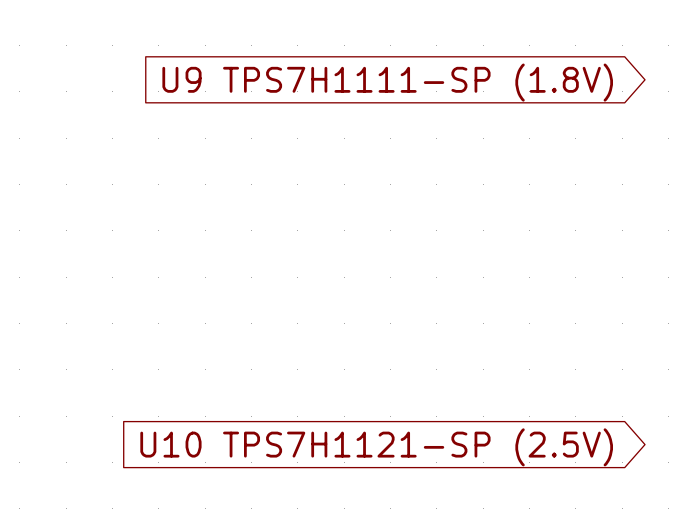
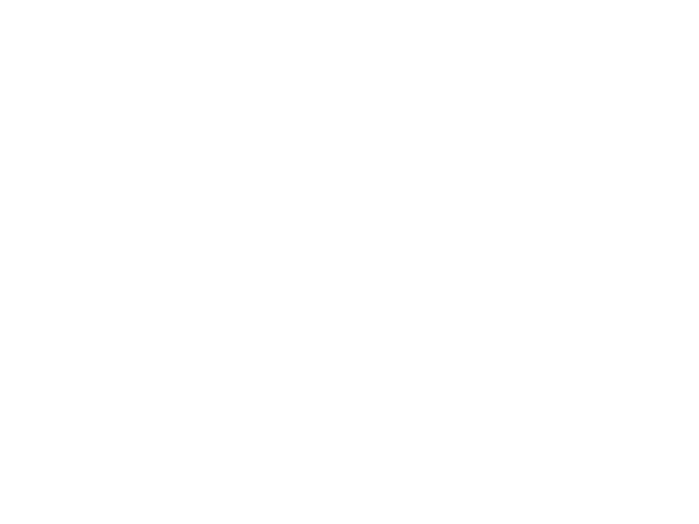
global label: U9 TPS7H1111-SP (1.8V) (387, 82) -> none
global label: U10 TPS7H1121-SP (2.5V) (376, 447) -> none

